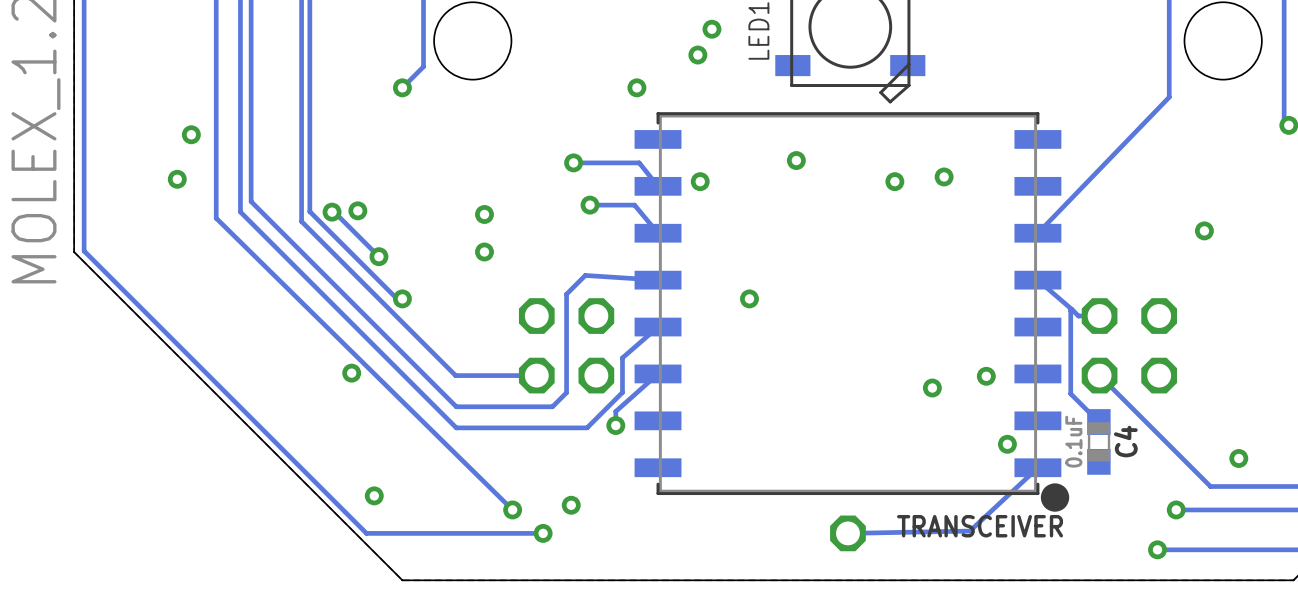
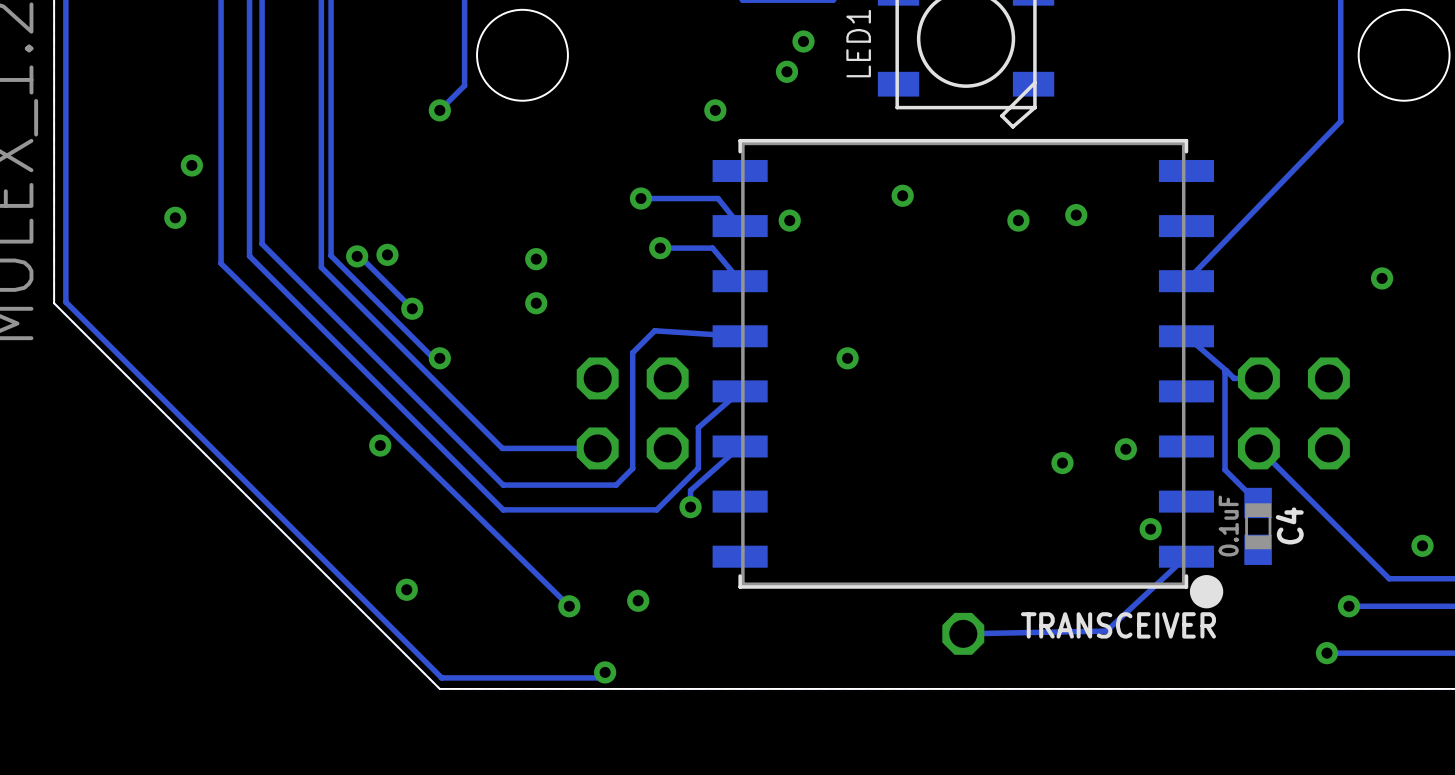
track: (543, 533) (366, 533) -> (605, 672) (599, 677) (441, 677) (397, 633)
via position: (543, 533) -> (605, 672)

